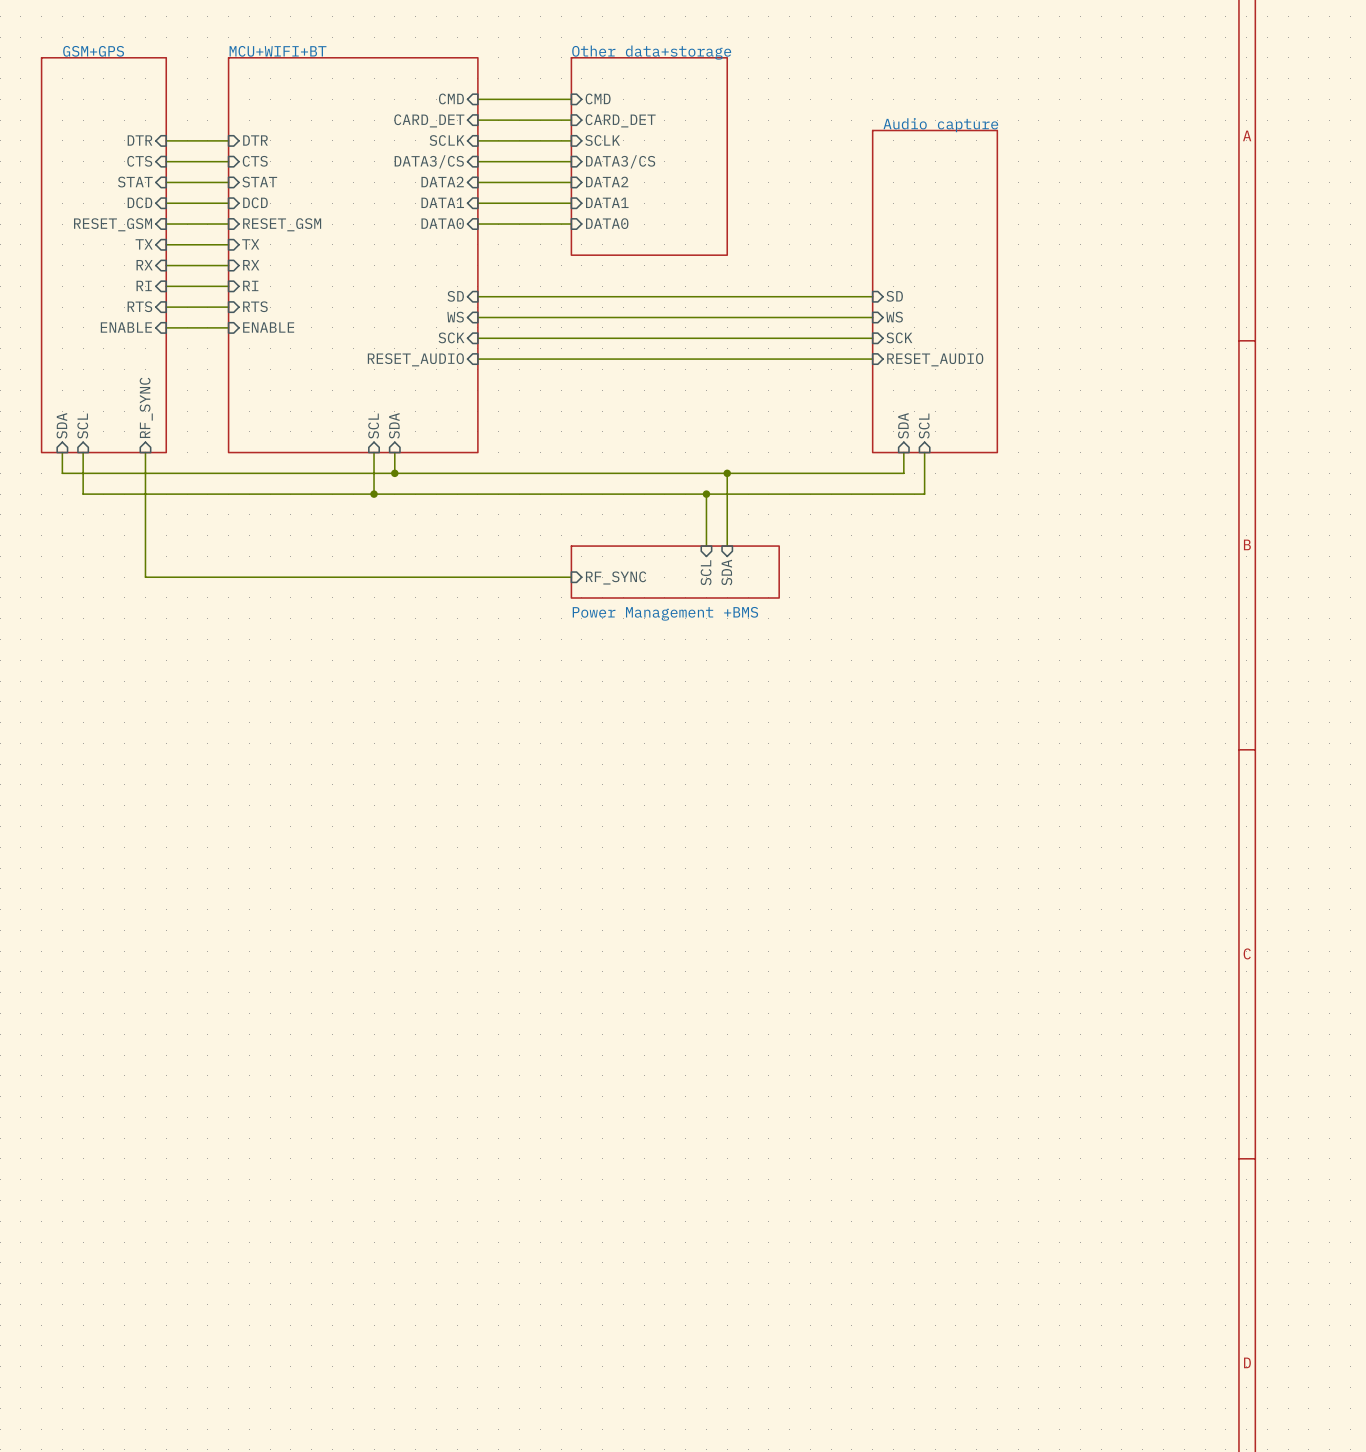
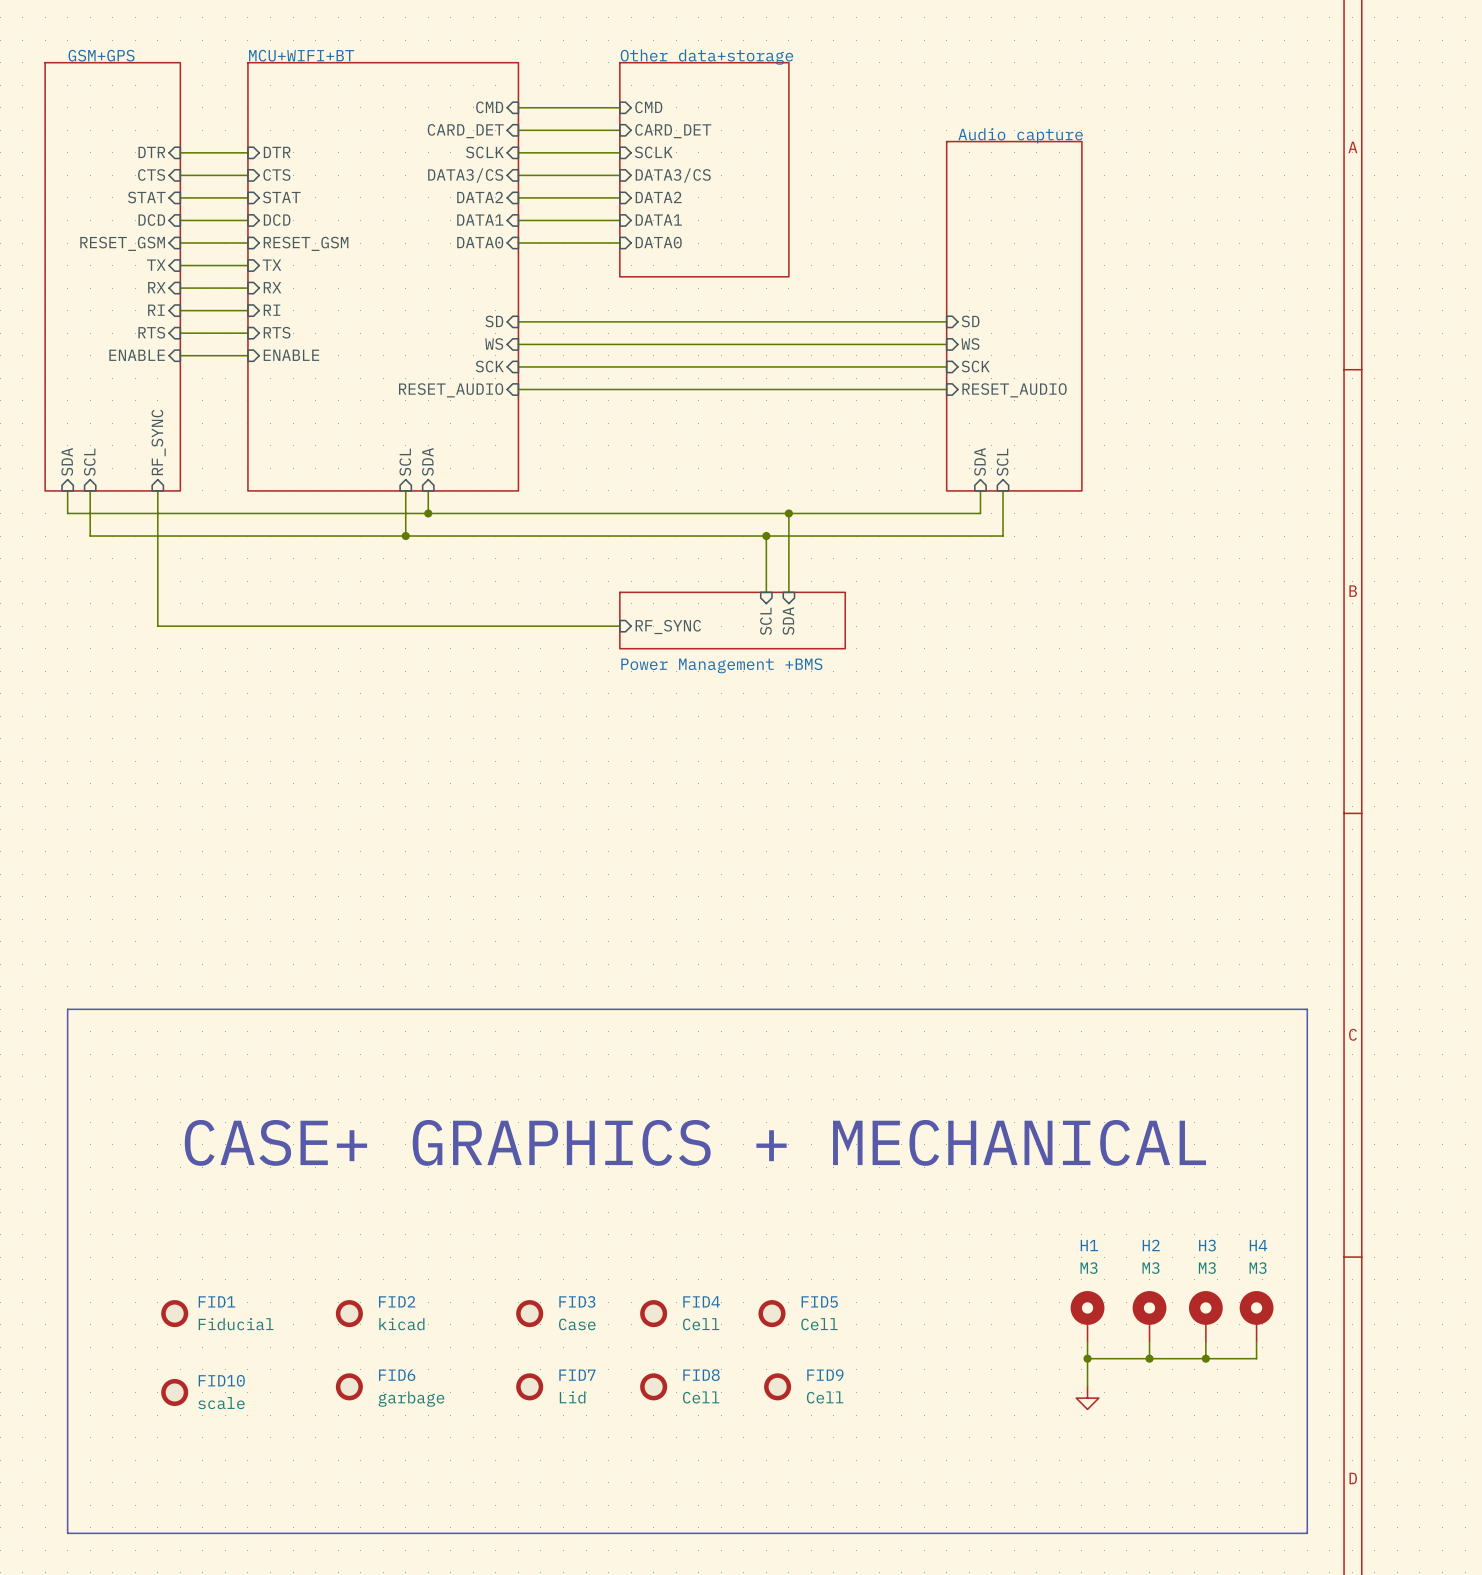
line: none -> (67, 1009) (1307, 1009) (1307, 1533) (67, 1533) (67, 1009)
text: none -> CASE+ GRAPHICS + MECHANICAL (695, 1142)
FID1: none -> Fiducial (174, 1313)
FID2: none -> kicad (349, 1313)
FID3: none -> Case (529, 1313)
FID4: none -> Cell (653, 1313)
FID5: none -> Cell (771, 1313)
H1: none -> M3 (1087, 1316)
H2: none -> M3 (1149, 1316)
H3: none -> M3 (1205, 1316)
H4: none -> M3 (1256, 1316)
wire: none -> (1087, 1341) (1087, 1386)
wire: none -> (1149, 1341) (1149, 1358)
wire: none -> (1205, 1341) (1205, 1358)
wire: none -> (1256, 1341) (1256, 1358) (1087, 1358)
junction: none -> (1087, 1358)
junction: none -> (1149, 1358)
junction: none -> (1205, 1358)
FID6: none -> garbage (349, 1386)
FID7: none -> Lid (529, 1386)
FID8: none -> Cell (653, 1386)
FID9: none -> Cell (777, 1386)
FID10: none -> scale (174, 1392)
power symbol: none -> (1087, 1398)

